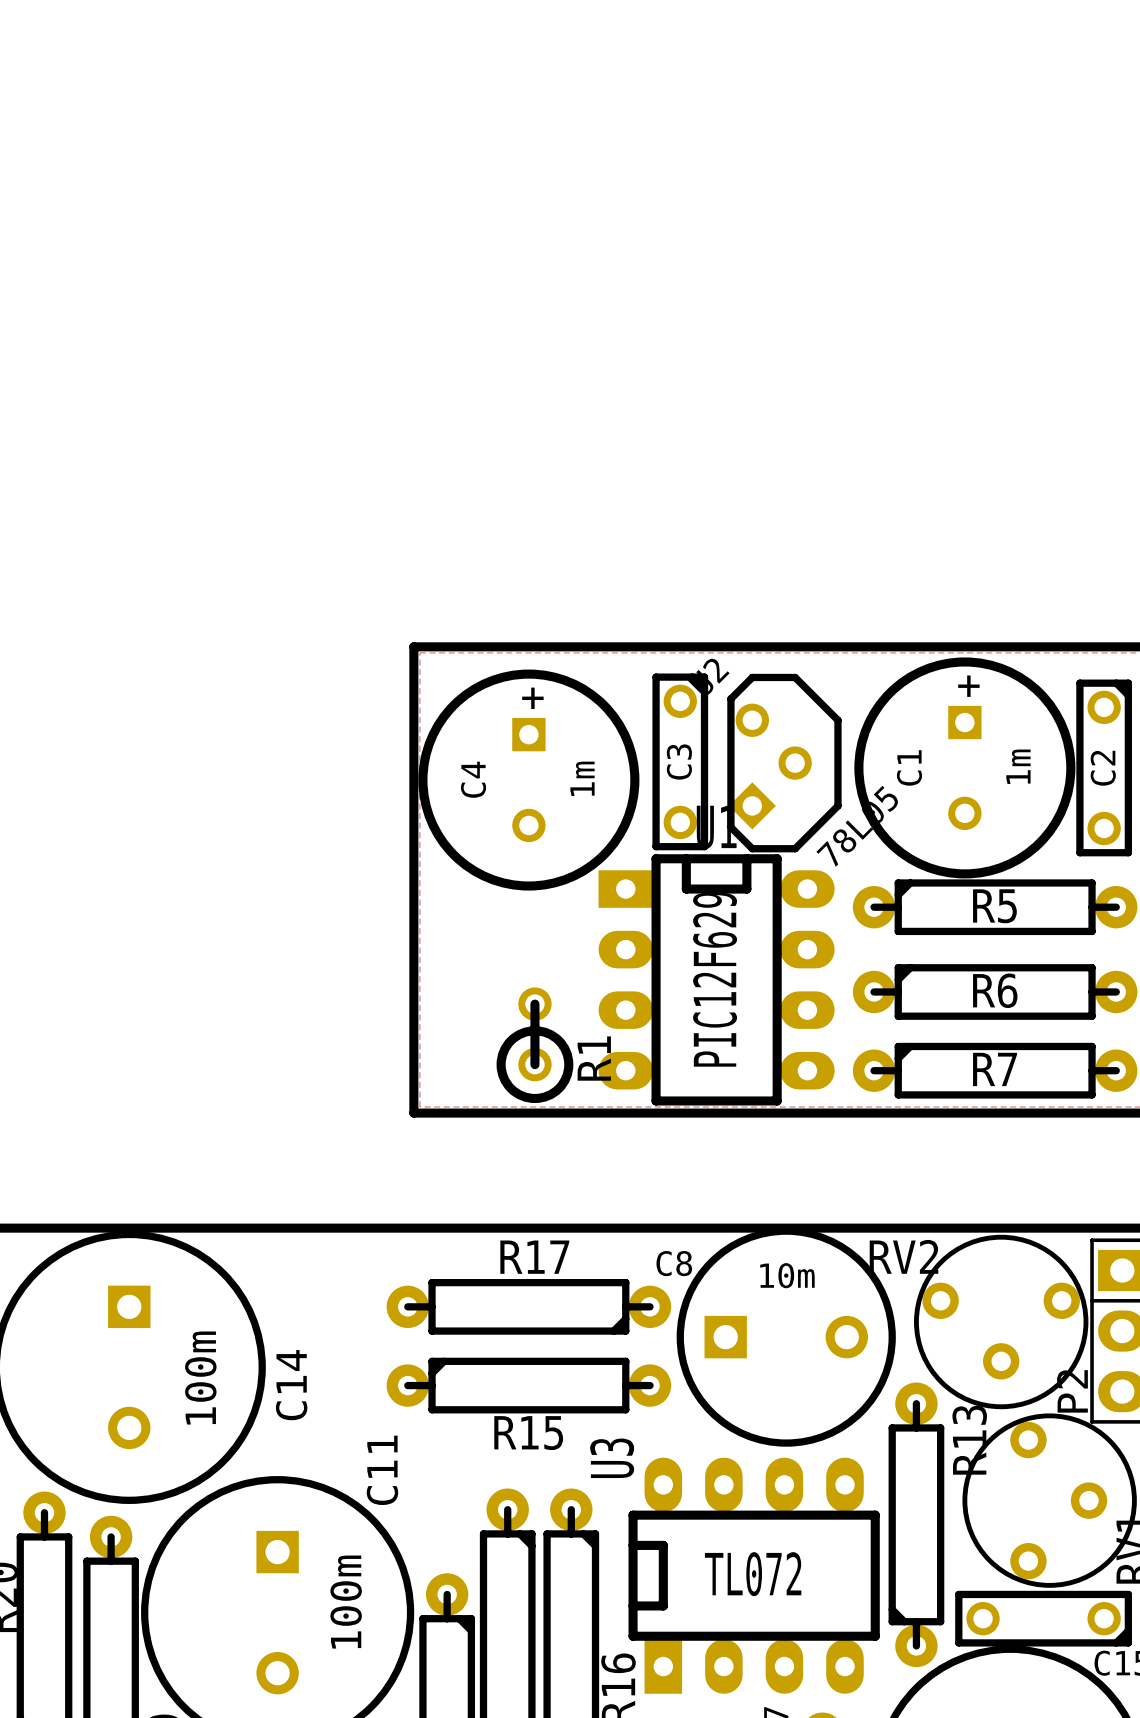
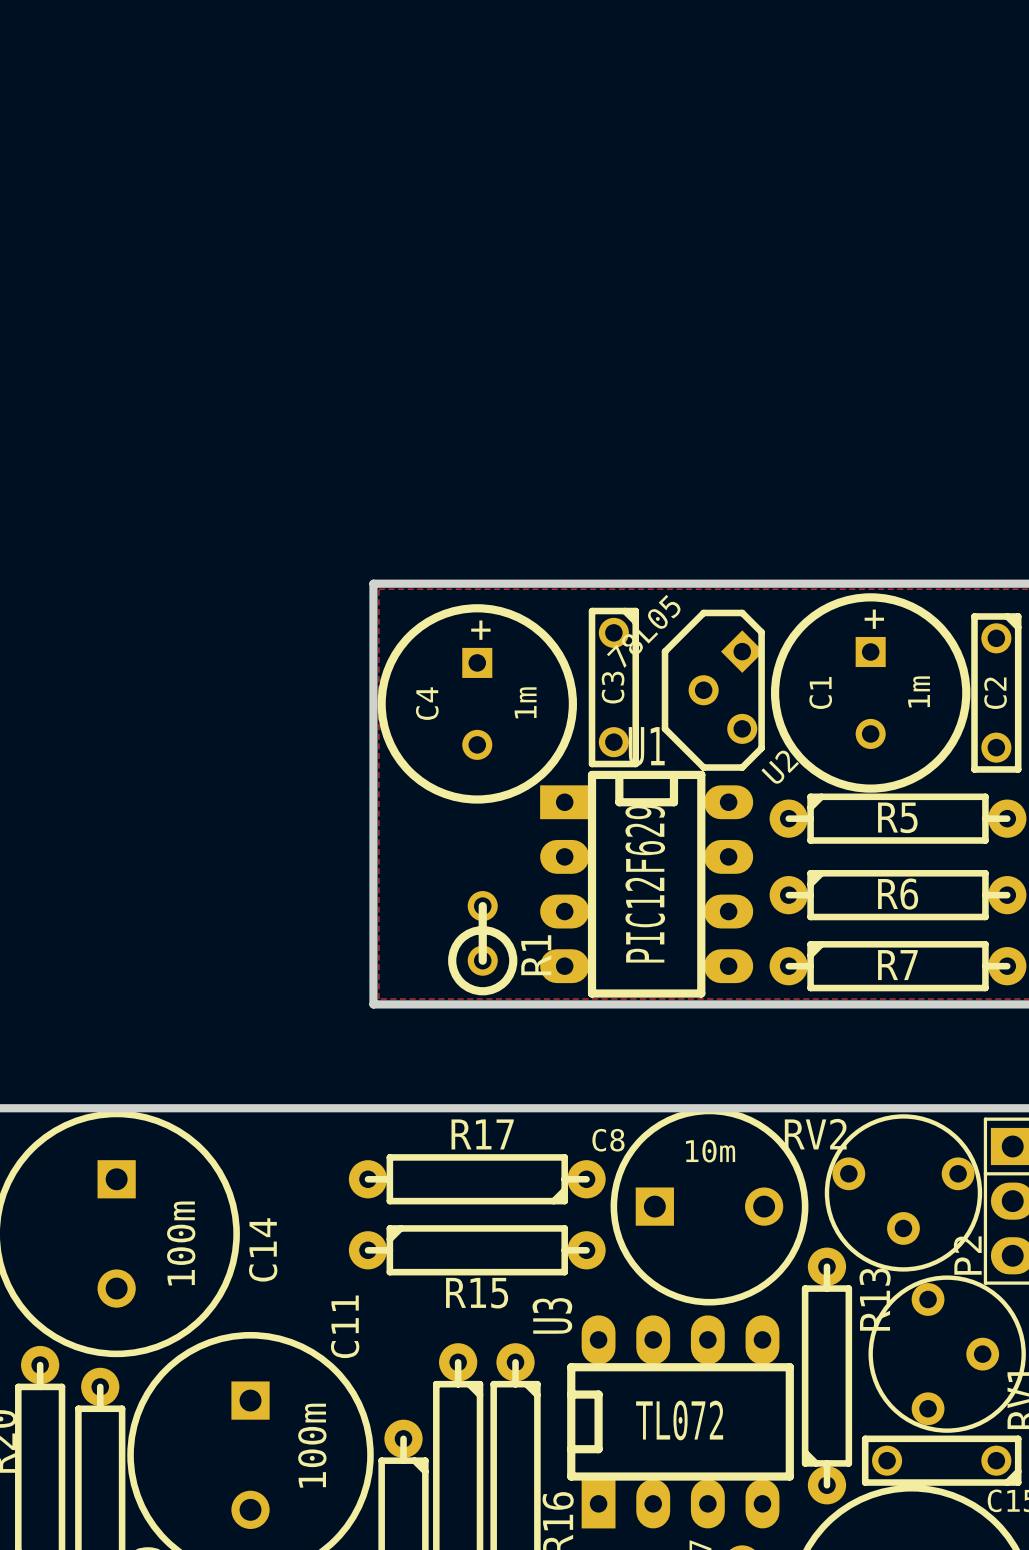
U2 rotation: 0° (784, 763) -> 180° (713, 690)

